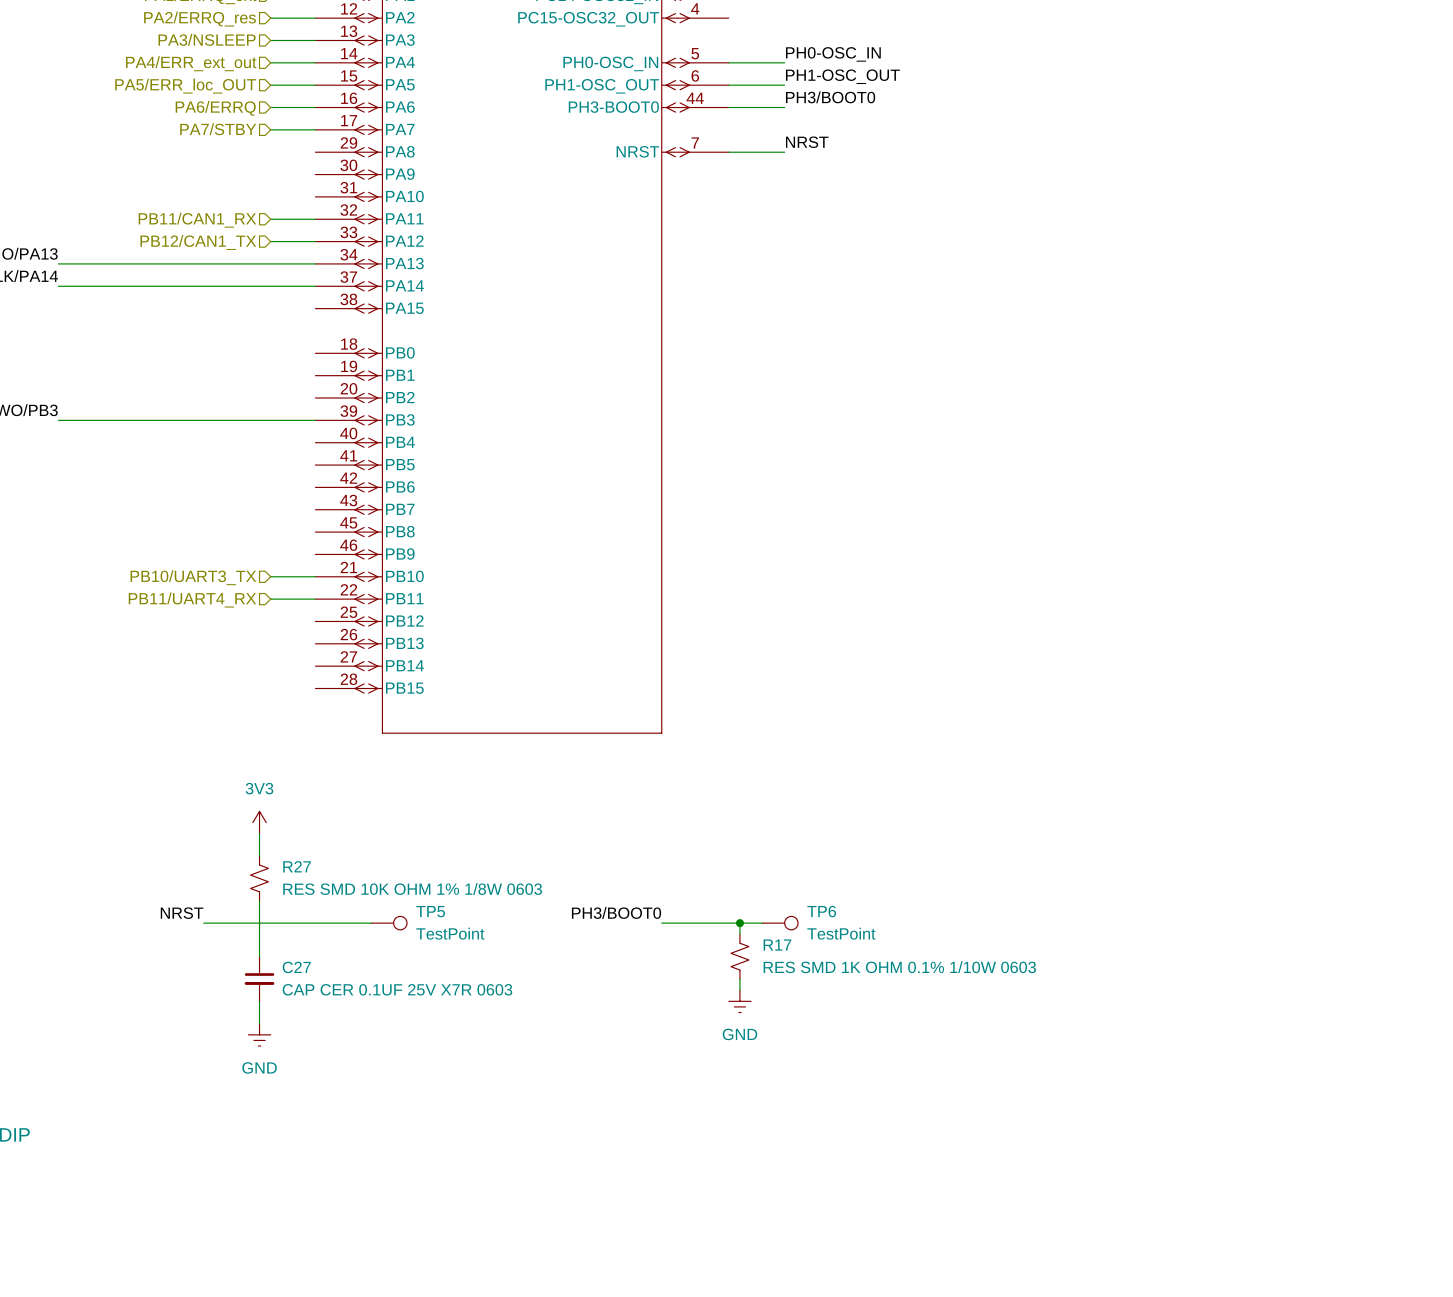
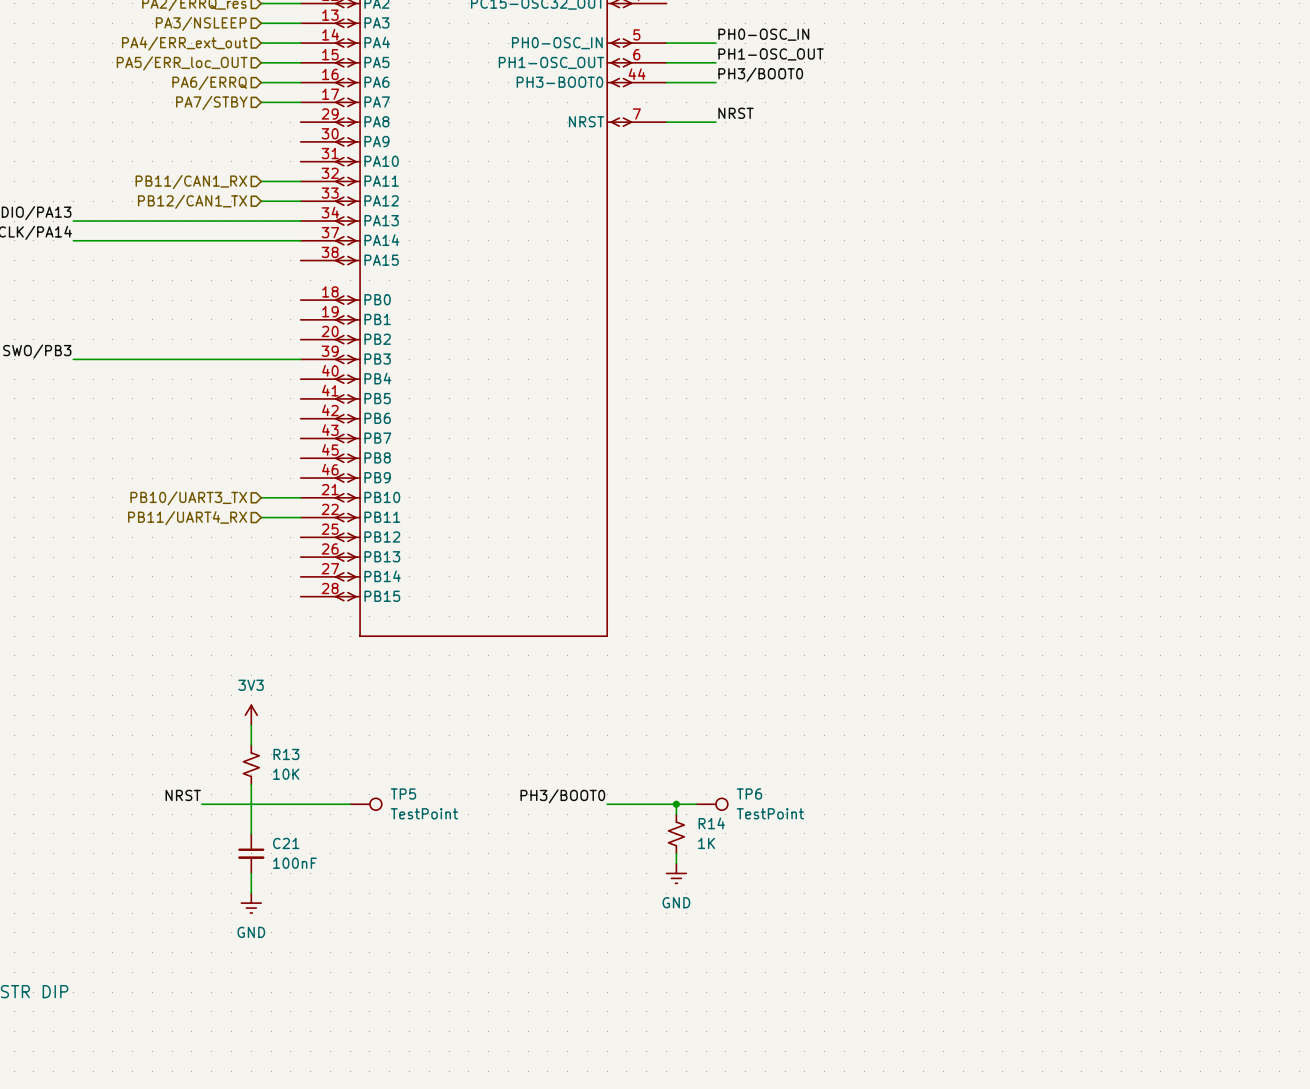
R27 name: R27 (297, 866) -> R13 (286, 754)
R27 value: RES SMD 10K OHM 1% 1/8W 0603 (412, 888) -> 10K (286, 774)
R17 name: R17 (777, 945) -> R14 (711, 823)
C27 name: C27 (296, 967) -> C21 (286, 843)
R17 value: RES SMD 1K OHM 0.1% 1/10W 0603 (899, 967) -> 1K (706, 843)
C27 value: CAP CER 0.1UF 25V X7R 0603 (397, 989) -> 100nF (294, 863)

